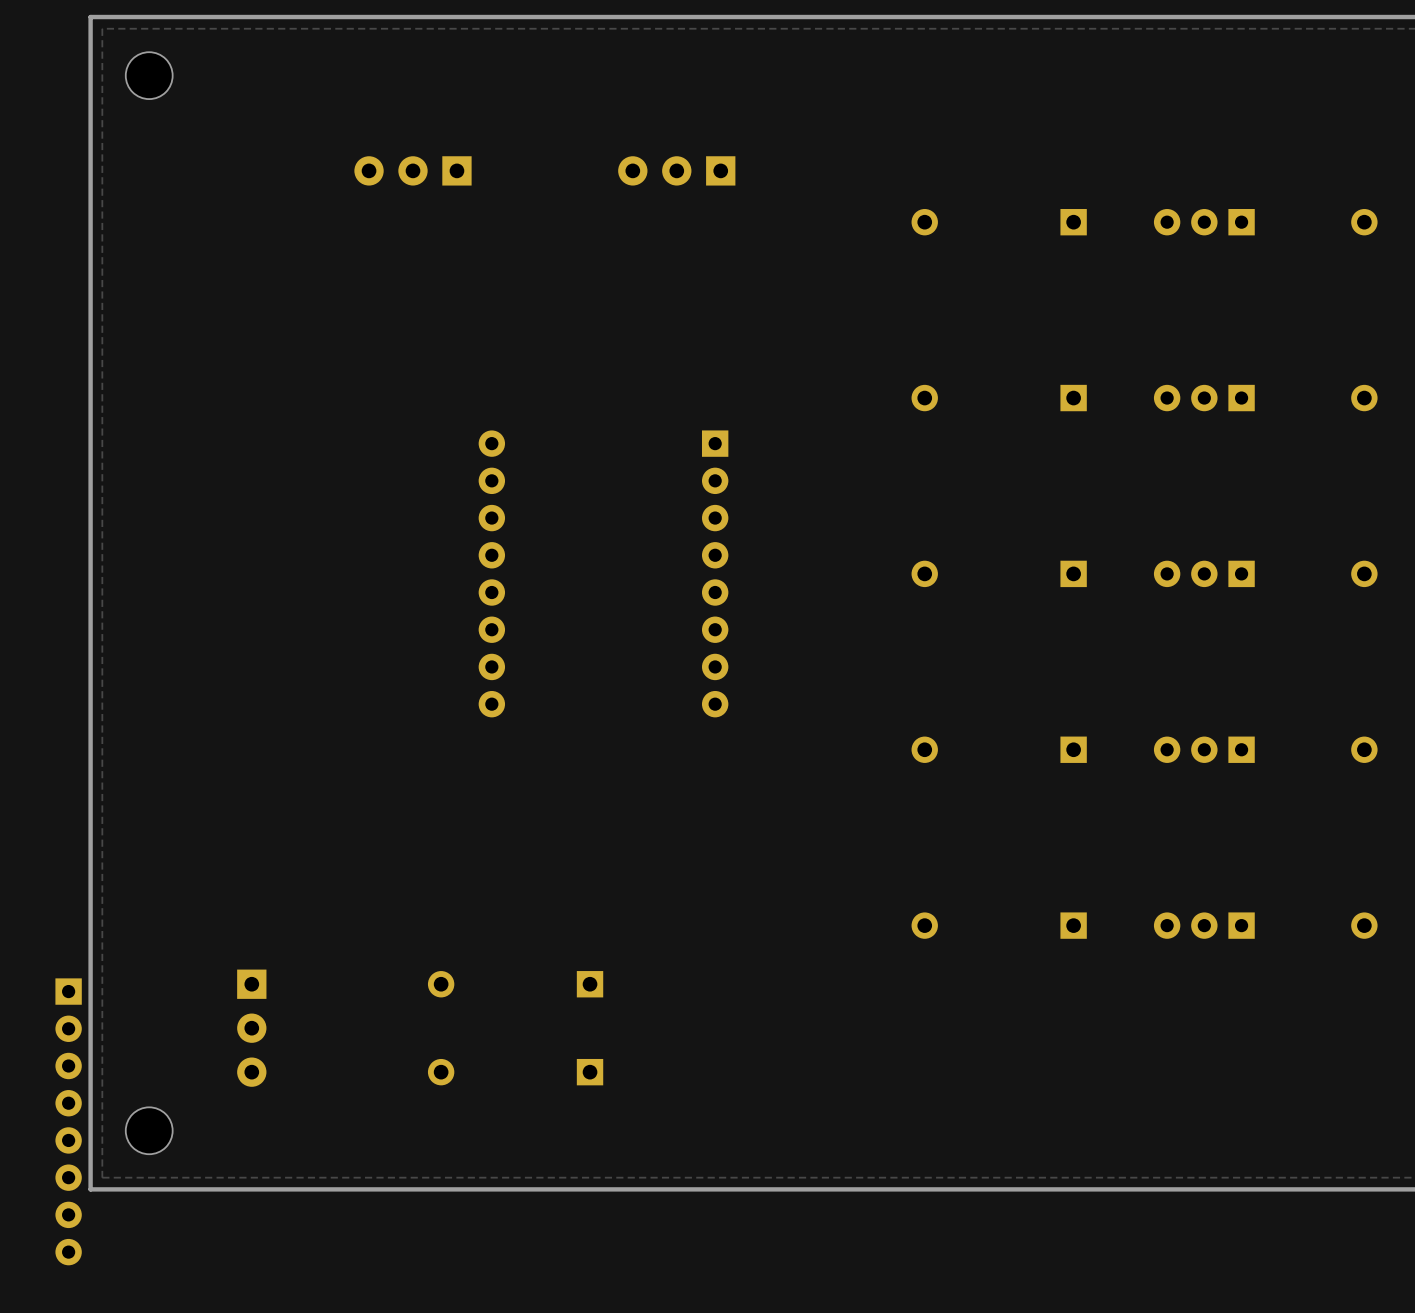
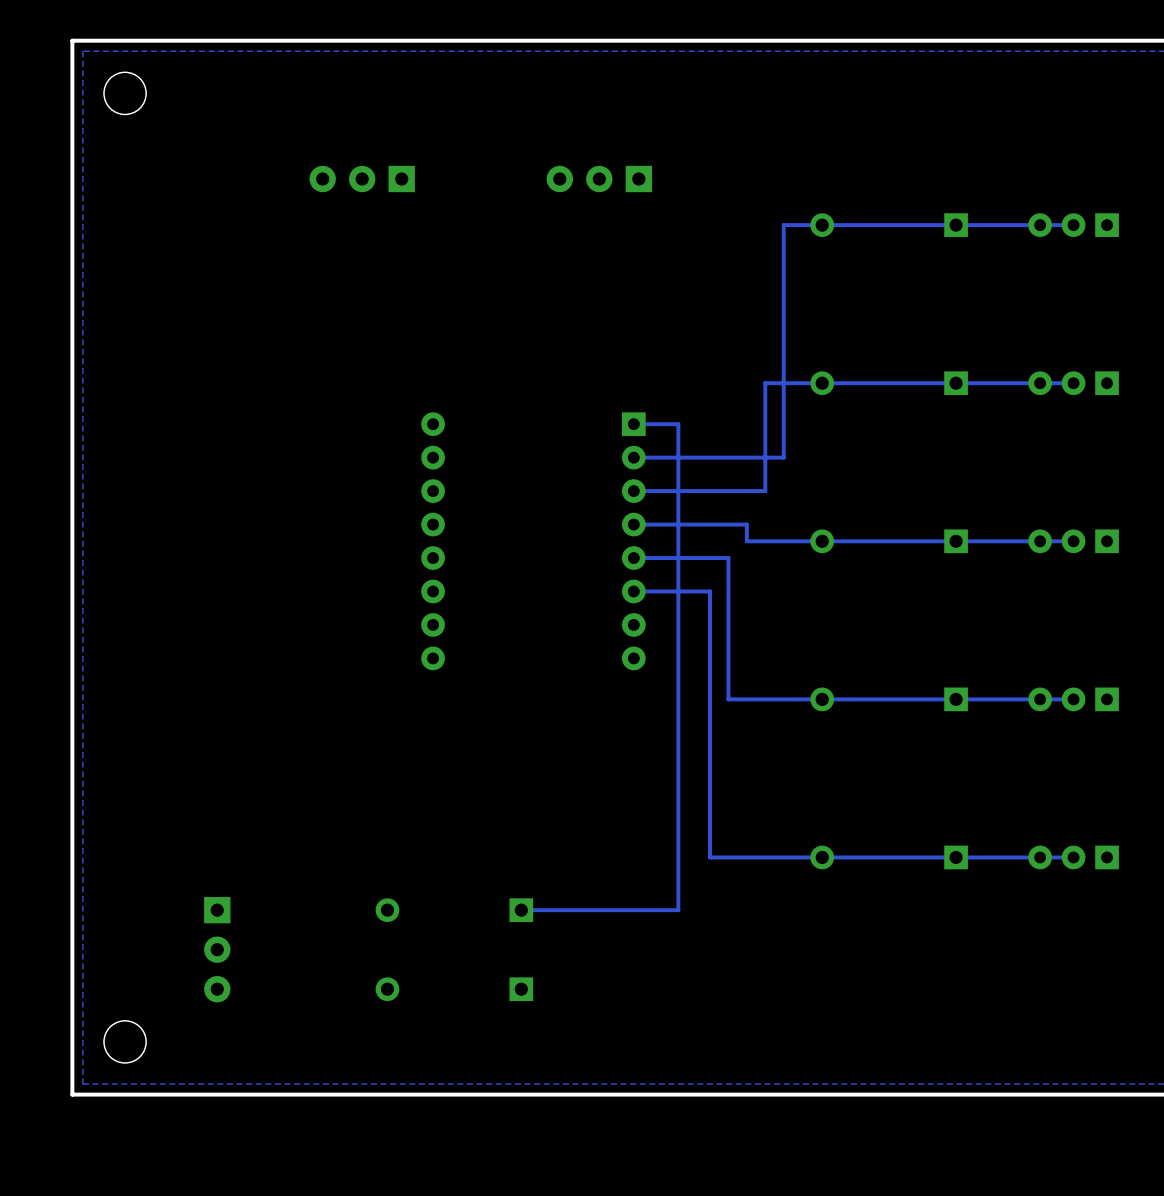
track: none -> (1073, 225) (783, 225) (783, 457) (633, 457)
track: none -> (1073, 383) (765, 383) (765, 491) (633, 491)
track: none -> (633, 424) (678, 424) (678, 910) (521, 910)
track: none -> (633, 524) (746, 524) (746, 541) (1073, 541)
track: none -> (633, 558) (728, 558) (728, 699) (1073, 699)
track: none -> (633, 591) (709, 591) (709, 857) (1073, 857)
part: (68, 1121) -> none

